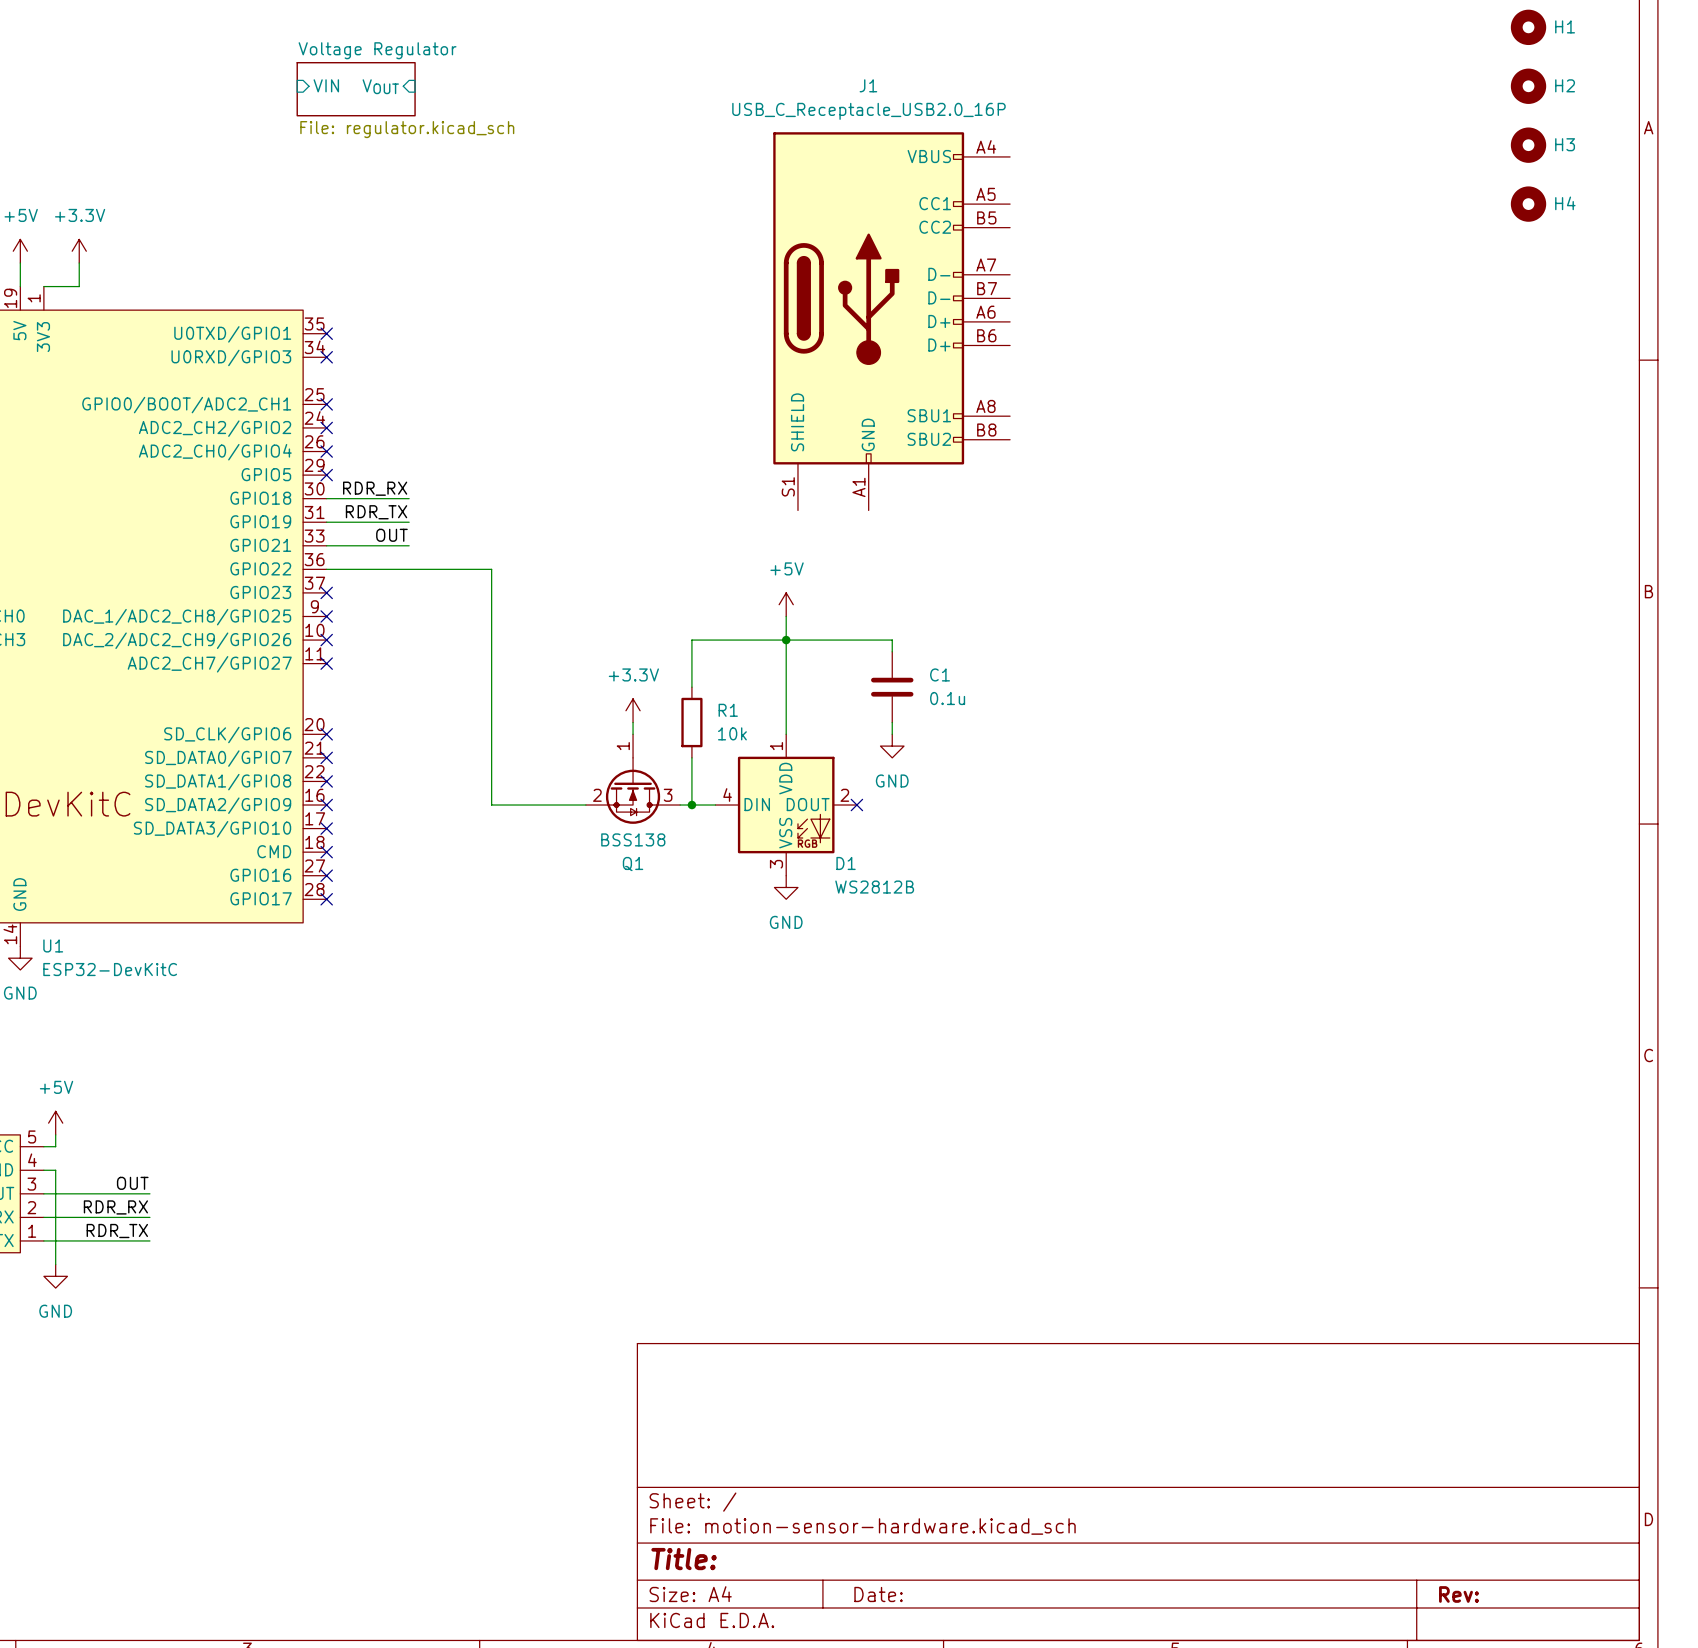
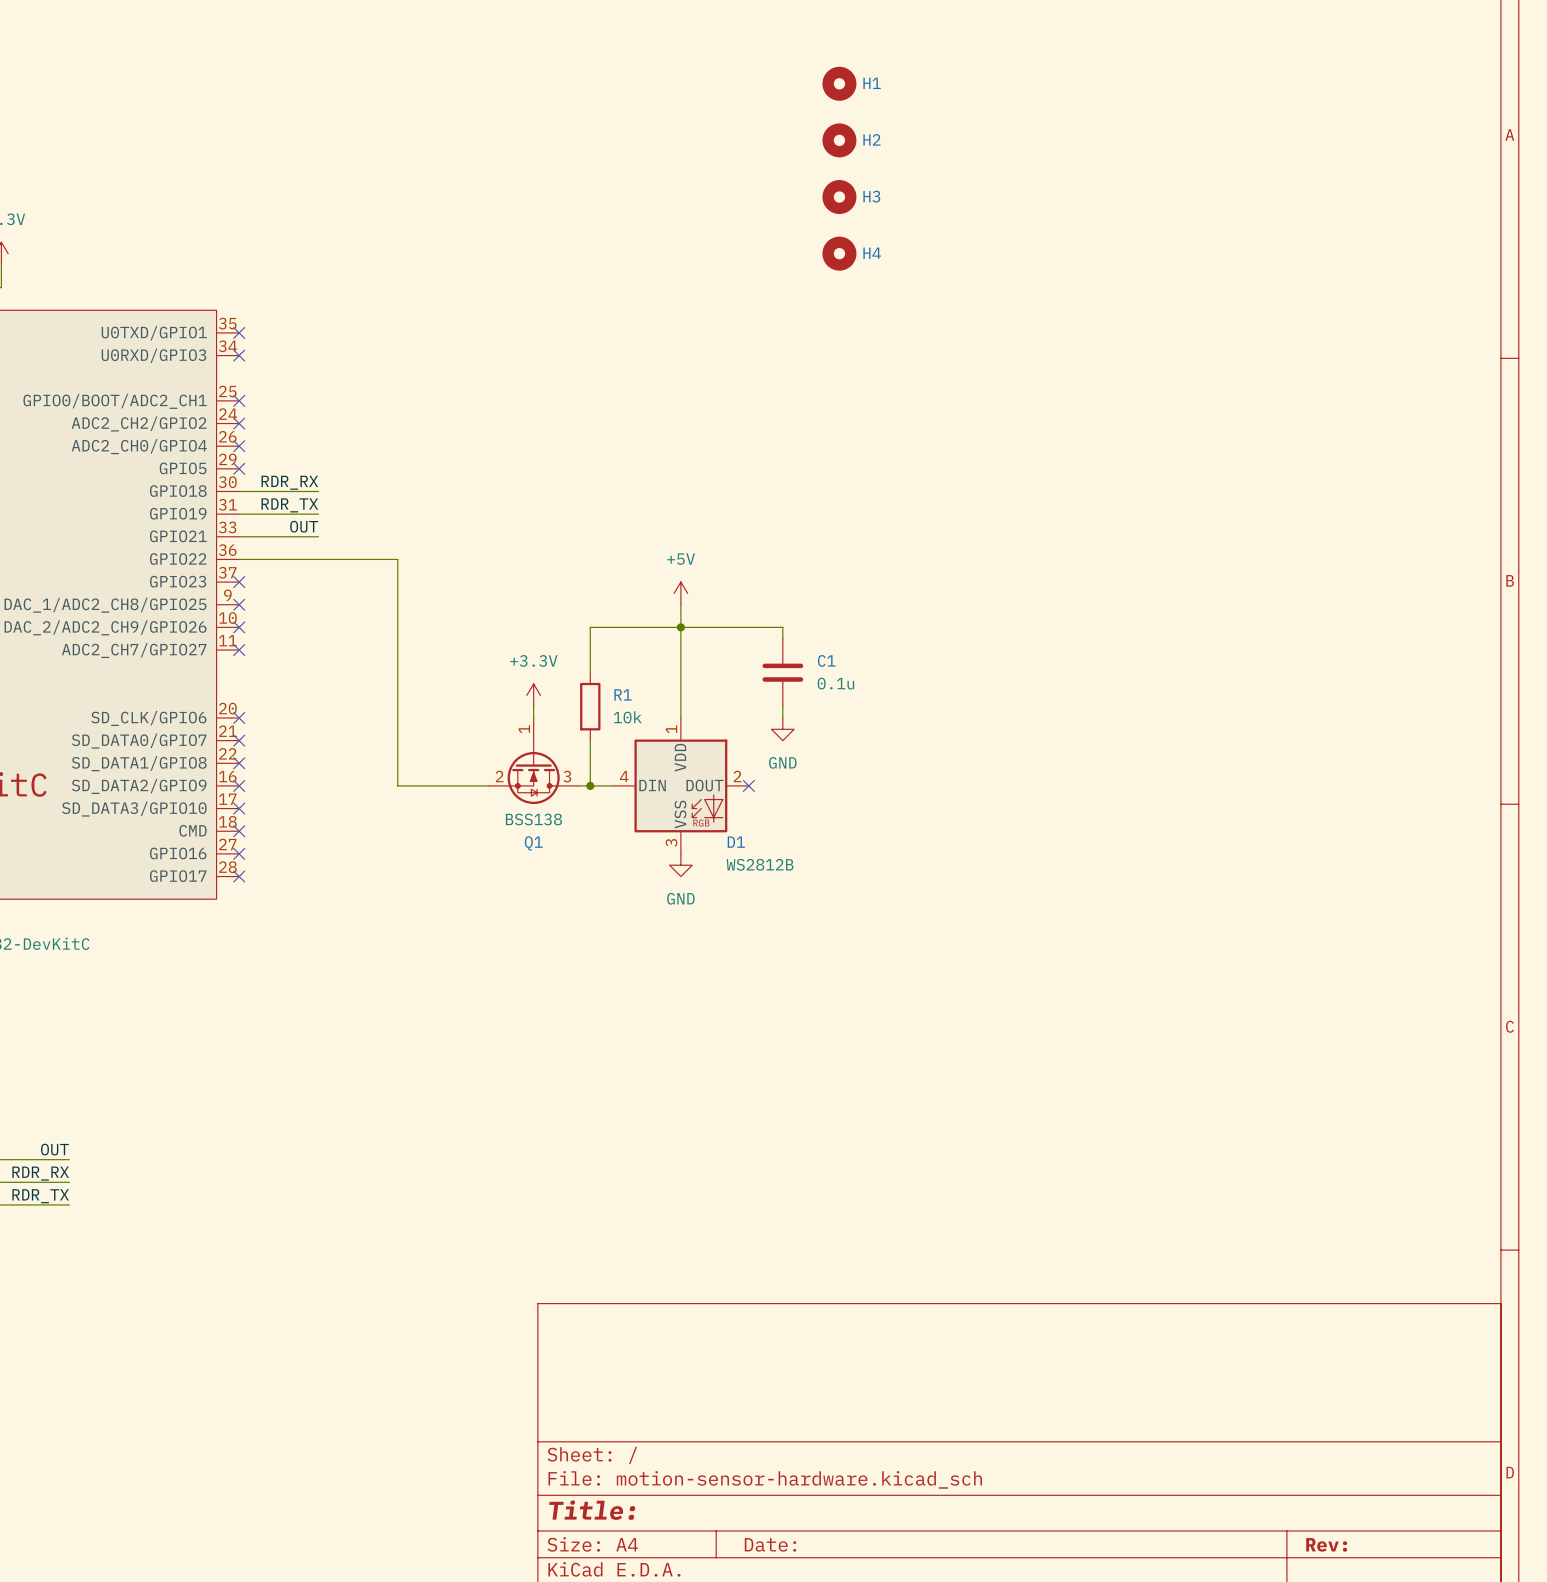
H1 position: (1528, 27) -> (839, 83)
sheet pin: VIN (326, 85) -> none
sheet pin: VOUT (380, 86) -> none
H2 position: (1528, 86) -> (839, 140)
sheet Voltage Regulator: File: regulator.kicad_sch (356, 89) -> none
H3 position: (1528, 145) -> (839, 197)
H4 position: (1528, 204) -> (839, 253)
J1: USB_C_Receptacle_USB2.0_16P (891, 321) -> none

